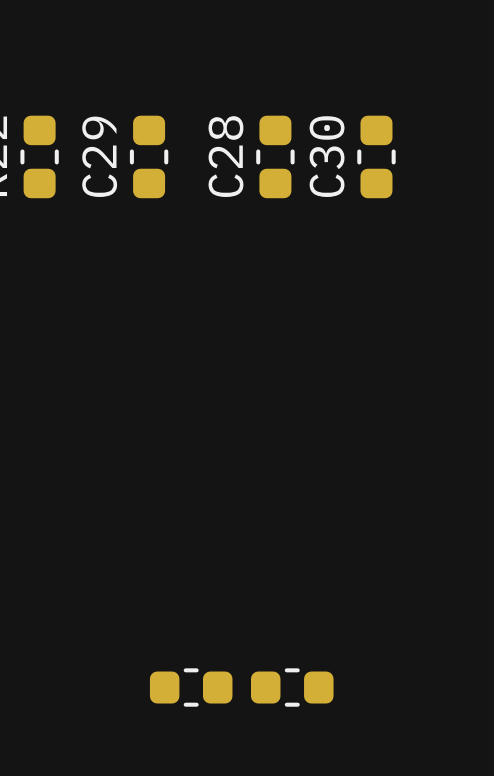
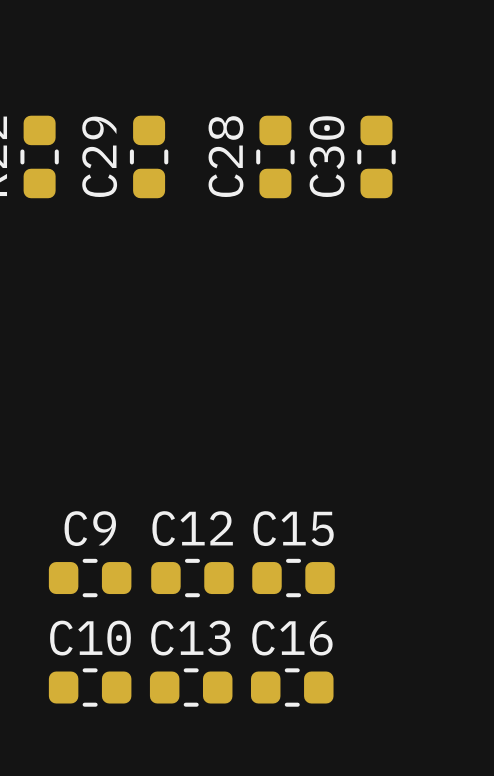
C9: none -> (90, 578)
C12: none -> (192, 578)
C15: none -> (293, 578)
C13 name: none -> C13 (190, 638)
C16 name: none -> C16 (292, 638)
C10: none -> (90, 687)

